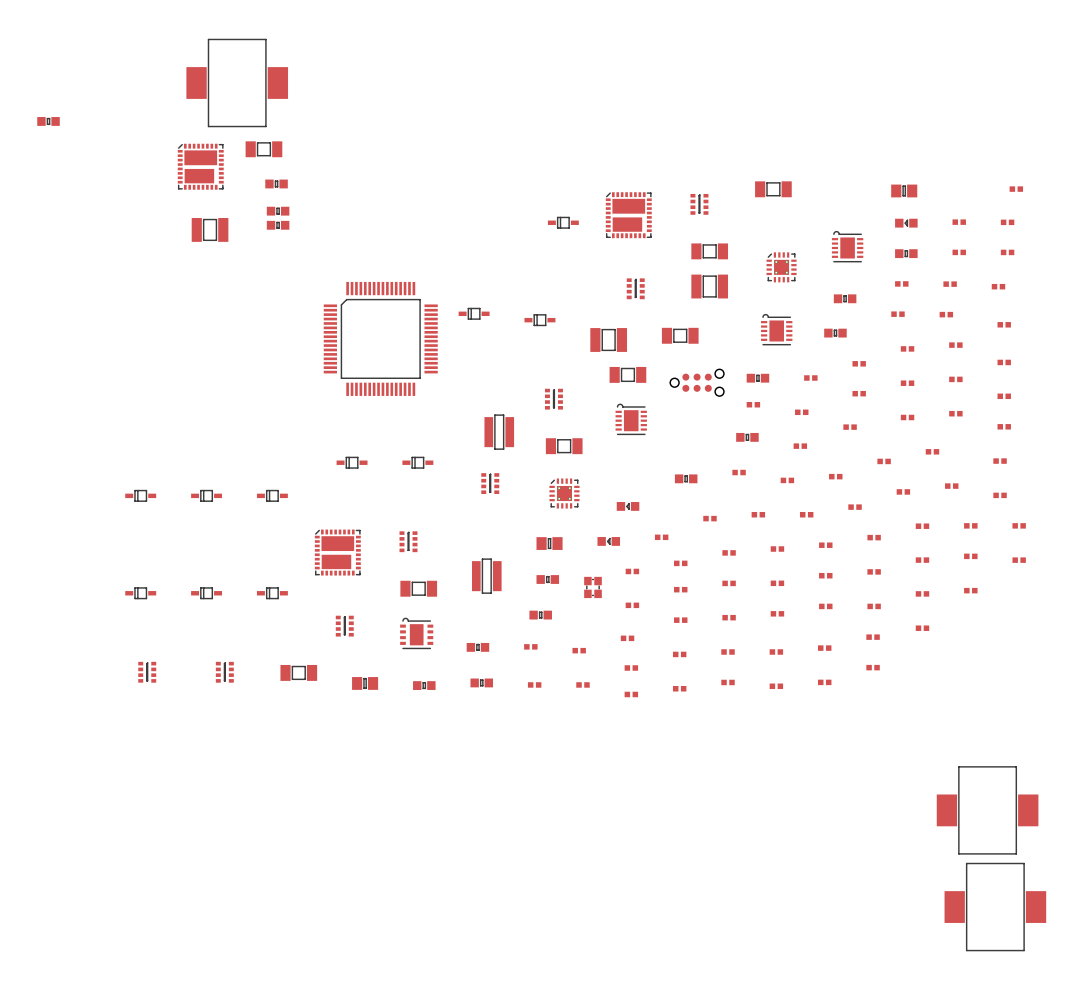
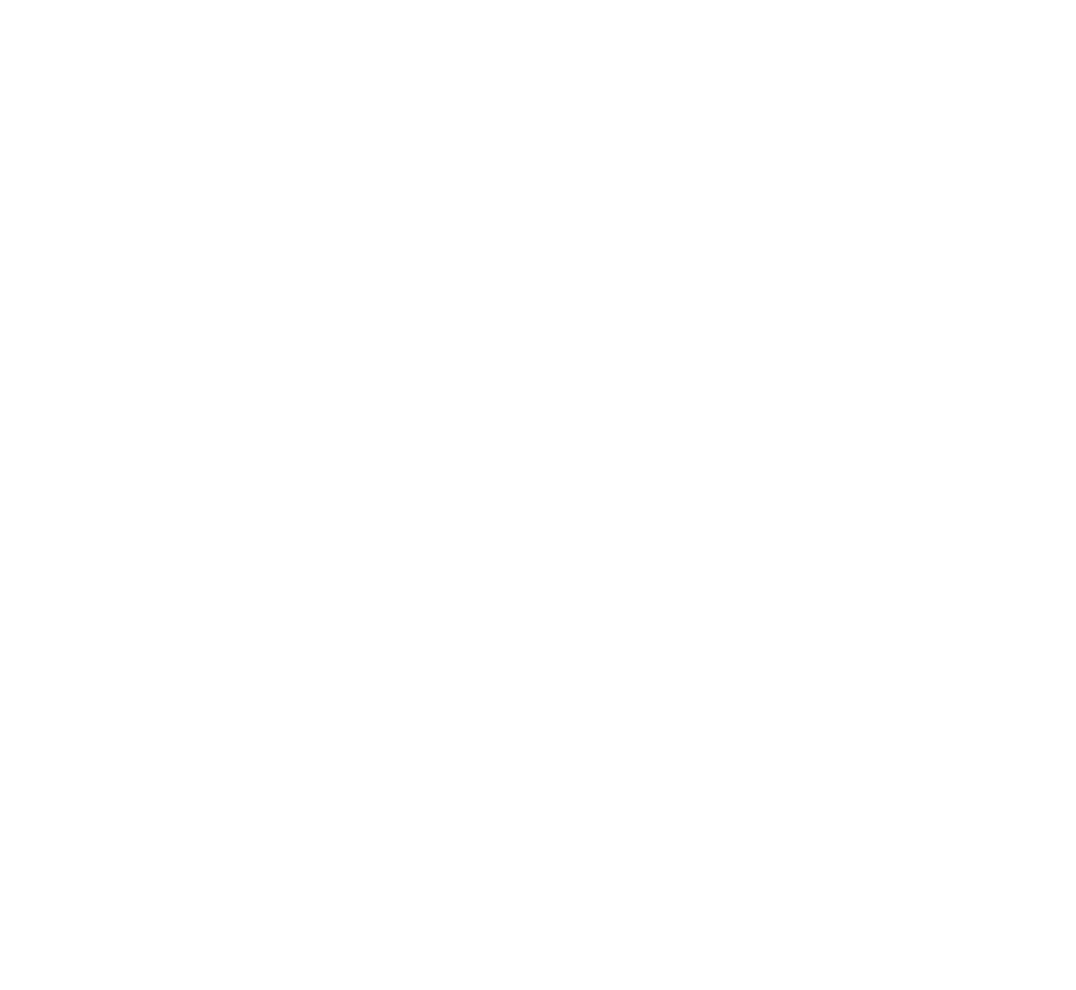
part: (237, 83) -> none
part: (48, 121) -> none
part: (263, 149) -> none
part: (200, 166) -> none
part: (276, 183) -> none
part: (773, 189) -> none
part: (1016, 189) -> none
part: (904, 190) -> none
part: (699, 204) -> none
part: (278, 211) -> none
part: (628, 215) -> none
part: (563, 222) -> none
part: (959, 222) -> none
part: (1007, 222) -> none
part: (906, 223) -> none
part: (278, 225) -> none
part: (210, 229) -> none
part: (847, 246) -> none
part: (709, 251) -> none
part: (959, 252) -> none
part: (1007, 252) -> none
part: (906, 253) -> none
part: (781, 267) -> none
part: (901, 283) -> none
part: (950, 284) -> none
part: (709, 286) -> none
part: (998, 286) -> none
part: (635, 288) -> none
part: (845, 298) -> none
part: (474, 313) -> none
part: (897, 314) -> none
part: (946, 314) -> none
part: (539, 320) -> none
part: (1004, 324) -> none
part: (776, 329) -> none
part: (835, 333) -> none
part: (680, 335) -> none
part: (380, 338) -> none
part: (608, 339) -> none
part: (955, 345) -> none
part: (907, 348) -> none
part: (1004, 362) -> none
part: (859, 363) -> none
part: (627, 374) -> none
part: (757, 378) -> none
part: (810, 378) -> none
part: (955, 379) -> none
part: (697, 382) -> none
part: (907, 383) -> none
part: (859, 393) -> none
part: (1004, 396) -> none
part: (553, 399) -> none
part: (753, 404) -> none
part: (801, 412) -> none
part: (955, 413) -> none
part: (907, 417) -> none
part: (631, 419) -> none
part: (1004, 426) -> none
part: (850, 427) -> none
part: (499, 432) -> none
part: (747, 437) -> none
part: (564, 446) -> none
part: (800, 446) -> none
part: (932, 451) -> none
part: (884, 461) -> none
part: (1000, 461) -> none
part: (352, 462) -> none
part: (417, 462) -> none
part: (739, 472) -> none
part: (835, 476) -> none
part: (686, 478) -> none
part: (787, 480) -> none
part: (490, 483) -> none
part: (951, 486) -> none
part: (903, 491) -> none
part: (564, 493) -> none
part: (140, 495) -> none
part: (206, 495) -> none
part: (272, 495) -> none
part: (1000, 495) -> none
part: (628, 506) -> none
part: (855, 507) -> none
part: (758, 514) -> none
part: (806, 514) -> none
part: (710, 518) -> none
part: (970, 525) -> none
part: (1019, 525) -> none
part: (922, 526) -> none
part: (661, 537) -> none
part: (874, 537) -> none
part: (408, 541) -> none
part: (608, 541) -> none
part: (549, 543) -> none
part: (825, 545) -> none
part: (777, 549) -> none
part: (337, 552) -> none
part: (729, 552) -> none
part: (970, 556) -> none
part: (922, 560) -> none
part: (1019, 560) -> none
part: (680, 563) -> none
part: (632, 571) -> none
part: (874, 571) -> none
part: (825, 575) -> none
part: (486, 576) -> none
part: (547, 579) -> none
part: (729, 583) -> none
part: (777, 583) -> none
part: (592, 587) -> none
part: (418, 588) -> none
part: (680, 589) -> none
part: (970, 590) -> none
part: (140, 593) -> none
part: (206, 593) -> none
part: (272, 593) -> none
part: (922, 593) -> none
part: (632, 605) -> none
part: (825, 606) -> none
part: (874, 606) -> none
part: (777, 613) -> none
part: (540, 615) -> none
part: (729, 617) -> none
part: (680, 620) -> none
part: (344, 626) -> none
part: (922, 628) -> none
part: (416, 633) -> none
part: (873, 637) -> none
part: (627, 638) -> none
part: (530, 646) -> none
part: (477, 647) -> none
part: (824, 648) -> none
part: (579, 650) -> none
part: (728, 651) -> none
part: (776, 651) -> none
part: (679, 654) -> none
part: (631, 667) -> none
part: (873, 667) -> none
part: (147, 672) -> none
part: (224, 672) -> none
part: (298, 672) -> none
part: (481, 682) -> none
part: (728, 682) -> none
part: (824, 682) -> none
part: (365, 683) -> none
part: (534, 684) -> none
part: (582, 684) -> none
part: (424, 685) -> none
part: (776, 686) -> none
part: (679, 688) -> none
part: (631, 694) -> none
part: (987, 810) -> none
part: (995, 907) -> none

